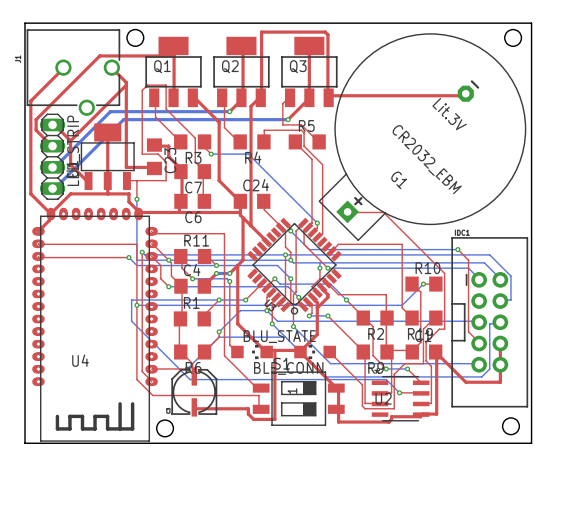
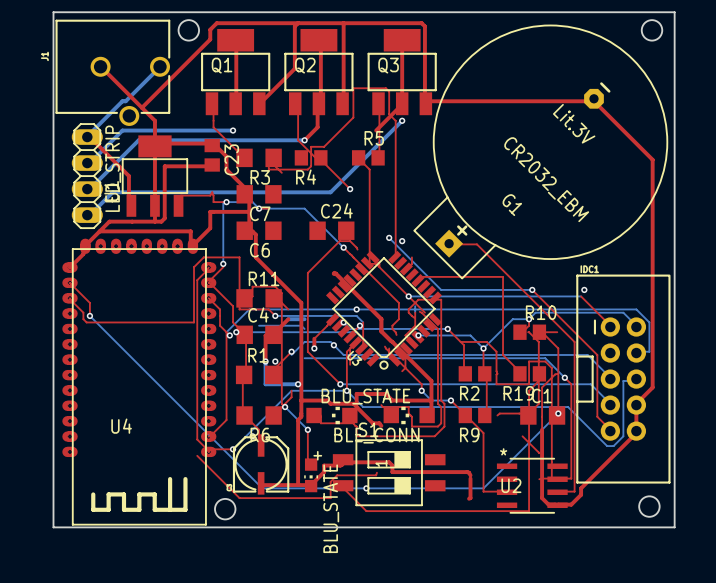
top track: none -> (343, 23) (216, 23) (210, 29) (210, 39) (141, 107)
top track: (174, 55) (99, 55) (36, 119) (36, 130) (52, 146) -> none
top track: (63, 67) (30, 101) (30, 193) (50, 214) -> (100, 66) (154, 120) (154, 146)
top track: (111, 67) (126, 82) (126, 167) (154, 168) -> none
bottom track: none -> (160, 66) (87, 137)
top track: (126, 85) (70, 140) (70, 164) (86, 180) -> (109, 156) (128, 176) (128, 205)
top track: none -> (593, 98) (594, 101) (652, 159) (652, 387) (636, 405)
top track: (192, 97) (219, 122) (219, 180) (240, 201) (240, 215) (266, 242) -> (259, 103) (294, 68) (294, 26) (298, 23)
top track: (260, 97) (251, 106) (251, 225) -> none
top track: (290, 97) (282, 103) (282, 124) (301, 124) (319, 141) -> (378, 103) (378, 157)
top track: (240, 101) (229, 111) -> (317, 107) (317, 127) (304, 140)
bottom track: (229, 111) (110, 111) (94, 127) -> (304, 140) (138, 140)
via position: (229, 111) -> (304, 140)
bottom track: none -> (402, 120) (330, 192) (112, 192)
bottom track: (123, 119) (73, 170) -> (174, 130) (122, 130) (89, 163) (87, 163)
bottom track: (171, 119) (288, 119) -> none
via: none -> (233, 130)
via position: (288, 119) -> (402, 120)
top track: none -> (154, 143) (210, 143) (212, 145) (213, 143) (226, 156) (226, 169) (249, 192) (249, 230) (255, 234) (255, 257) (301, 302) (301, 415) (298, 420) (298, 485)
top track: (304, 132) (301, 130) (264, 130) (263, 141) -> (395, 146) (395, 120) (389, 114) (389, 91) (385, 88) (353, 88) (353, 117) (324, 146) (311, 146) (311, 166) (307, 169) (268, 169) (268, 157)
R4 footprint: [233, 134, 271, 150] -> [294, 150, 328, 166]
R5 footprint: [288, 134, 326, 150] -> [351, 150, 385, 166]
C23 footprint: [146, 138, 162, 176] -> [204, 138, 220, 172]
top track: none -> (320, 157) (350, 189)
top track: (295, 141) (312, 159) (312, 223) (304, 231) (304, 244) -> (358, 157) (369, 169) (369, 263) (376, 263) (395, 283)
top track: (154, 145) (168, 146) (168, 156) (182, 172) (182, 199) (179, 201) (179, 212) -> none
top track: (304, 146) (322, 164) (322, 233) (317, 237) -> (395, 163) (395, 257) (390, 261)
top track: none -> (212, 165) (164, 166) (164, 218) (161, 221)
bottom track: (211, 154) (248, 154) (317, 223) -> none
via: (211, 154) -> none
via: none -> (350, 189)
via: none -> (226, 202)
top track: (128, 180) (166, 180) (166, 162) (158, 154) (142, 154) (142, 90) (147, 85) (166, 85) (166, 109) (195, 138) (195, 162) (204, 171) (204, 201) -> (181, 205) (181, 195) (210, 195) (212, 192) (213, 202) (226, 202)
top track: (136, 180) (136, 199) -> none
top track: none -> (259, 208) (268, 208)
via: none -> (259, 208)
top track: (113, 193) (128, 193) (128, 201) (136, 209) -> (99, 231) (190, 231) (190, 241)
bottom track: (136, 199) (136, 260) (484, 262) (489, 268) -> none
via: (136, 199) -> none
top track: (263, 201) (264, 209) (285, 231) (285, 246) (290, 252) (290, 260) -> none
via: none -> (389, 237)
via: none -> (402, 241)
top track: (139, 212) (240, 212) -> (194, 244) (210, 228) (210, 211) (249, 211)
top track: (370, 212) (383, 212) (444, 273) (444, 329) (439, 329) (426, 342) (426, 361) (431, 366) -> (477, 244) (574, 341) (574, 491) (557, 492)
top track: none -> (343, 247) (398, 302) (398, 319) (392, 325) (396, 334)
bottom track: none -> (343, 247) (304, 208) (259, 208) (252, 202) (223, 202) (223, 263)
via: none -> (343, 247)
top track: none -> (357, 249) (350, 241) (339, 241) (307, 272) (307, 351) (340, 384)
top track: (243, 217) (243, 260) (229, 273) -> none
top track: (303, 223) (296, 231) (296, 292) (293, 294) (293, 326) -> none
via: (317, 223) -> none
top track: none -> (223, 263) (223, 267) (208, 282)
via: none -> (223, 263)
top track: (151, 231) (152, 233) (224, 233) (224, 355) (258, 390) (261, 388) -> (208, 267) (197, 280) (197, 293)
bottom track: (290, 231) (309, 249) (341, 249) -> (389, 237) (441, 289)
via: (290, 231) -> none
top track: none -> (334, 272) (381, 319) (381, 331) (431, 381) (430, 415)
top track: (38, 244) (136, 244) (136, 379) (142, 384) -> (70, 283) (89, 302) (89, 315)
top track: none -> (413, 284) (421, 276) (503, 276) (503, 354) (519, 373)
bottom track: (415, 249) (457, 249) -> none
via: none -> (532, 289)
top track: (457, 249) (468, 260) (468, 302) -> (532, 289) (597, 354)
top track: (331, 251) (338, 244) (402, 244) (402, 307) (412, 318) -> none
bottom track: (142, 252) (144, 254) (314, 254) -> none
via: (142, 252) -> none
top track: (285, 254) (285, 297) (280, 302) -> none
via: (285, 254) -> none
via: none -> (408, 296)
top track: none -> (581, 296) (610, 327)
bottom track: (455, 254) (489, 254) (500, 265) -> (363, 309) (636, 309)
top track: (180, 256) (182, 268) (192, 278) -> none
top track: none -> (249, 298) (252, 296) (252, 286) (275, 286) (281, 293) (281, 403) (285, 407)
top track: (38, 257) (128, 257) -> (70, 299) (83, 312) (83, 319) (86, 322) (194, 322) (194, 267) (203, 257) (239, 257) (239, 309) (268, 309) (275, 315)
bottom track: (128, 257) (136, 265) (184, 265) -> (226, 332) (249, 309)
via: (128, 257) -> none
via: (168, 260) -> none
via: (290, 260) -> none
via: (216, 265) -> none
top track: (237, 265) (237, 289) -> (328, 323) (314, 338)
via: none -> (356, 309)
bottom track: (277, 265) (290, 278) -> none
top track: none -> (419, 311) (437, 328) (437, 403) (441, 407) (441, 423) (437, 426) (411, 426) (411, 416) (408, 413) (408, 407) (382, 407) (381, 405)
via: (319, 268) -> none
bottom track: (327, 268) (418, 268) -> (418, 335) (470, 335) (483, 348) (512, 319) (529, 319) (535, 312)
via: (327, 268) -> none
bottom track: (468, 268) (479, 279) -> (597, 312) (623, 312)
bottom track: none -> (89, 315) (262, 488) (483, 488) (558, 413)
via: none -> (89, 315)
bottom track: none -> (275, 315) (356, 315) (363, 322)
via: none -> (275, 315)
top track: none -> (413, 317) (408, 312) (408, 309) (418, 299) (441, 299) (441, 400) (444, 403) (444, 426) (434, 436) (356, 436) (356, 426) (353, 423) (320, 423) (320, 415)
via: (216, 273) -> none
via: (229, 273) -> none
top track: none -> (529, 319) (529, 325) (522, 332) (519, 332)
bottom track: none -> (343, 322) (350, 328) (447, 328)
via: none -> (343, 322)
top track: none -> (363, 322) (363, 348) (357, 352)
R10 footprint: [405, 276, 443, 292] -> [513, 324, 547, 340]
via: (192, 278) -> none
bottom track: (274, 278) (280, 284) (330, 284) (346, 300) -> none
top track: (290, 278) (290, 302) (285, 306) -> none
via: (290, 278) -> none
top track: (319, 278) (325, 278) (325, 281) (338, 294) (386, 294) (386, 300) -> (460, 341) (486, 341) (496, 351)
top track: (229, 281) (229, 345) (237, 352) -> none
via: (229, 281) -> none
top track: none -> (447, 328) (463, 345) (465, 373)
via: none -> (447, 328)
top track: (262, 283) (245, 300) -> none
bottom track: none -> (236, 332) (356, 332) (369, 345)
via: none -> (236, 332)
top track: none -> (539, 332) (542, 332) (558, 348) (558, 413)
bottom track: (423, 284) (402, 305) -> (564, 377) (545, 358) (516, 358)
via position: (423, 284) -> (529, 319)
bottom track: (168, 286) (288, 286) (298, 297) -> none
top track: none -> (268, 334) (265, 335) (265, 361)
via: none -> (418, 335)
top track: (322, 287) (327, 297) (317, 307) -> none
via: none -> (333, 345)
top track: none -> (351, 346) (346, 351) (346, 390)
top track: none -> (384, 346) (421, 384) (421, 390)
top track: (237, 297) (237, 323) (264, 350) (266, 352) (266, 350) (298, 350) (300, 352) -> none
via: none -> (314, 348)
top track: (276, 297) (272, 302) (272, 323) -> none
via: (298, 297) -> none
top track: (312, 297) (317, 302) (317, 334) (300, 352) -> none
top track: none -> (483, 348) (483, 371) (486, 374) (486, 413)
via: none -> (483, 348)
bottom track: (245, 300) (131, 300) (131, 321) (189, 379) (386, 379) (399, 392) -> none
via: (245, 300) -> none
top track: (346, 300) (373, 326) (373, 355) (386, 368) -> none
via: (346, 300) -> none
bottom track: (136, 305) (229, 305) -> none
via: (136, 305) -> none
bottom track: none -> (265, 361) (265, 384) (298, 384)
via: none -> (265, 361)
via: none -> (275, 361)
via: (266, 310) -> none
R2 footprint: [356, 310, 394, 326] -> [458, 366, 492, 382]
R19 footprint: [405, 310, 443, 326] -> [513, 366, 547, 382]
bottom track: (309, 315) (327, 315) -> none
via: (309, 315) -> none
top track: (327, 315) (365, 353) (365, 400) -> (311, 486) (324, 472) (324, 465) (340, 465) (343, 462) (389, 462) (392, 465) (392, 472) (467, 472) (470, 475)
via: (327, 315) -> none
top track: none -> (564, 377) (571, 384) (571, 478) (557, 479)
via: none -> (564, 377)
bottom track: (479, 321) (277, 321) (266, 310) (240, 310) (219, 331) -> (610, 377) (587, 354) (343, 354) (330, 341) (304, 341) (291, 354)
bottom track: (272, 323) (325, 376) (476, 376) -> (233, 449) (291, 390) (346, 390) (363, 407) (568, 407) (607, 446)
via: (272, 323) -> none
top track: none -> (538, 381) (529, 390) (529, 511) (366, 511) (342, 486)
via: none -> (298, 384)
bottom track: none -> (340, 384) (590, 384) (610, 405)
via: none -> (340, 384)
bottom track: (293, 326) (330, 363) (479, 364) -> none
via: (293, 326) -> none
top track: (386, 326) (386, 350) (387, 352) (391, 350) (391, 392) (380, 393) -> (496, 384) (529, 384) (529, 361) (545, 361) (551, 368) (551, 433)
via: (219, 331) -> none
via: none -> (346, 390)
bottom track: none -> (421, 390) (431, 400) (450, 400)
via: none -> (421, 390)
top track: (468, 331) (479, 343) -> (597, 390) (597, 416) (610, 431)
bottom track: (285, 337) (219, 337) (187, 368) -> none
top track: none -> (301, 400) (327, 400) (330, 403) (355, 405)
top track: none -> (431, 400) (392, 400) (385, 394) (356, 394) (355, 405)
top track: none -> (450, 400) (483, 433) (483, 491) (507, 492)
via: none -> (450, 400)
top track: none -> (355, 405) (372, 423) (379, 423) (381, 425)
R9 footprint: [356, 344, 394, 360] -> [458, 407, 492, 424]
bottom track: none -> (285, 407) (307, 429)
via: none -> (285, 407)
top track: (274, 350) (274, 419) (253, 419) (248, 414) (248, 408) (235, 408) -> none
via: none -> (558, 413)
top track: (300, 352) (338, 390) (338, 408) (336, 409) (338, 411) (338, 422) (388, 422) (391, 416) (420, 416) (423, 414) (436, 414) (436, 353) (465, 382) (500, 382) (500, 366) -> (542, 429) (542, 498) (548, 504) (557, 505) (571, 504) (581, 494) (581, 488) (636, 433)
top track: (329, 352) (362, 384) (362, 406) (365, 408) (394, 408) (394, 374) (404, 363) (423, 363) -> none
top track: none -> (307, 429) (307, 459) (311, 464)
via: none -> (307, 429)
top track: (152, 368) (187, 368) -> (210, 436) (226, 420) (226, 332)
bottom track: (386, 368) (407, 368) -> none
via: (386, 368) -> none
via: (407, 368) -> none
top track: none -> (233, 449) (210, 449) (208, 451)
via: none -> (233, 449)
top track: (399, 392) (421, 393) -> none
via: (399, 392) -> none
top track: (152, 395) (258, 395) (258, 408) (261, 409) -> (210, 468) (239, 498) (330, 498) (330, 481) (337, 475) (376, 475) (376, 472)
U2 position: (400, 398) -> (532, 485)
BLU_STATE: none -> (311, 475)
top track: (365, 403) (380, 404) -> (470, 478) (469, 498)
via: none -> (366, 488)

